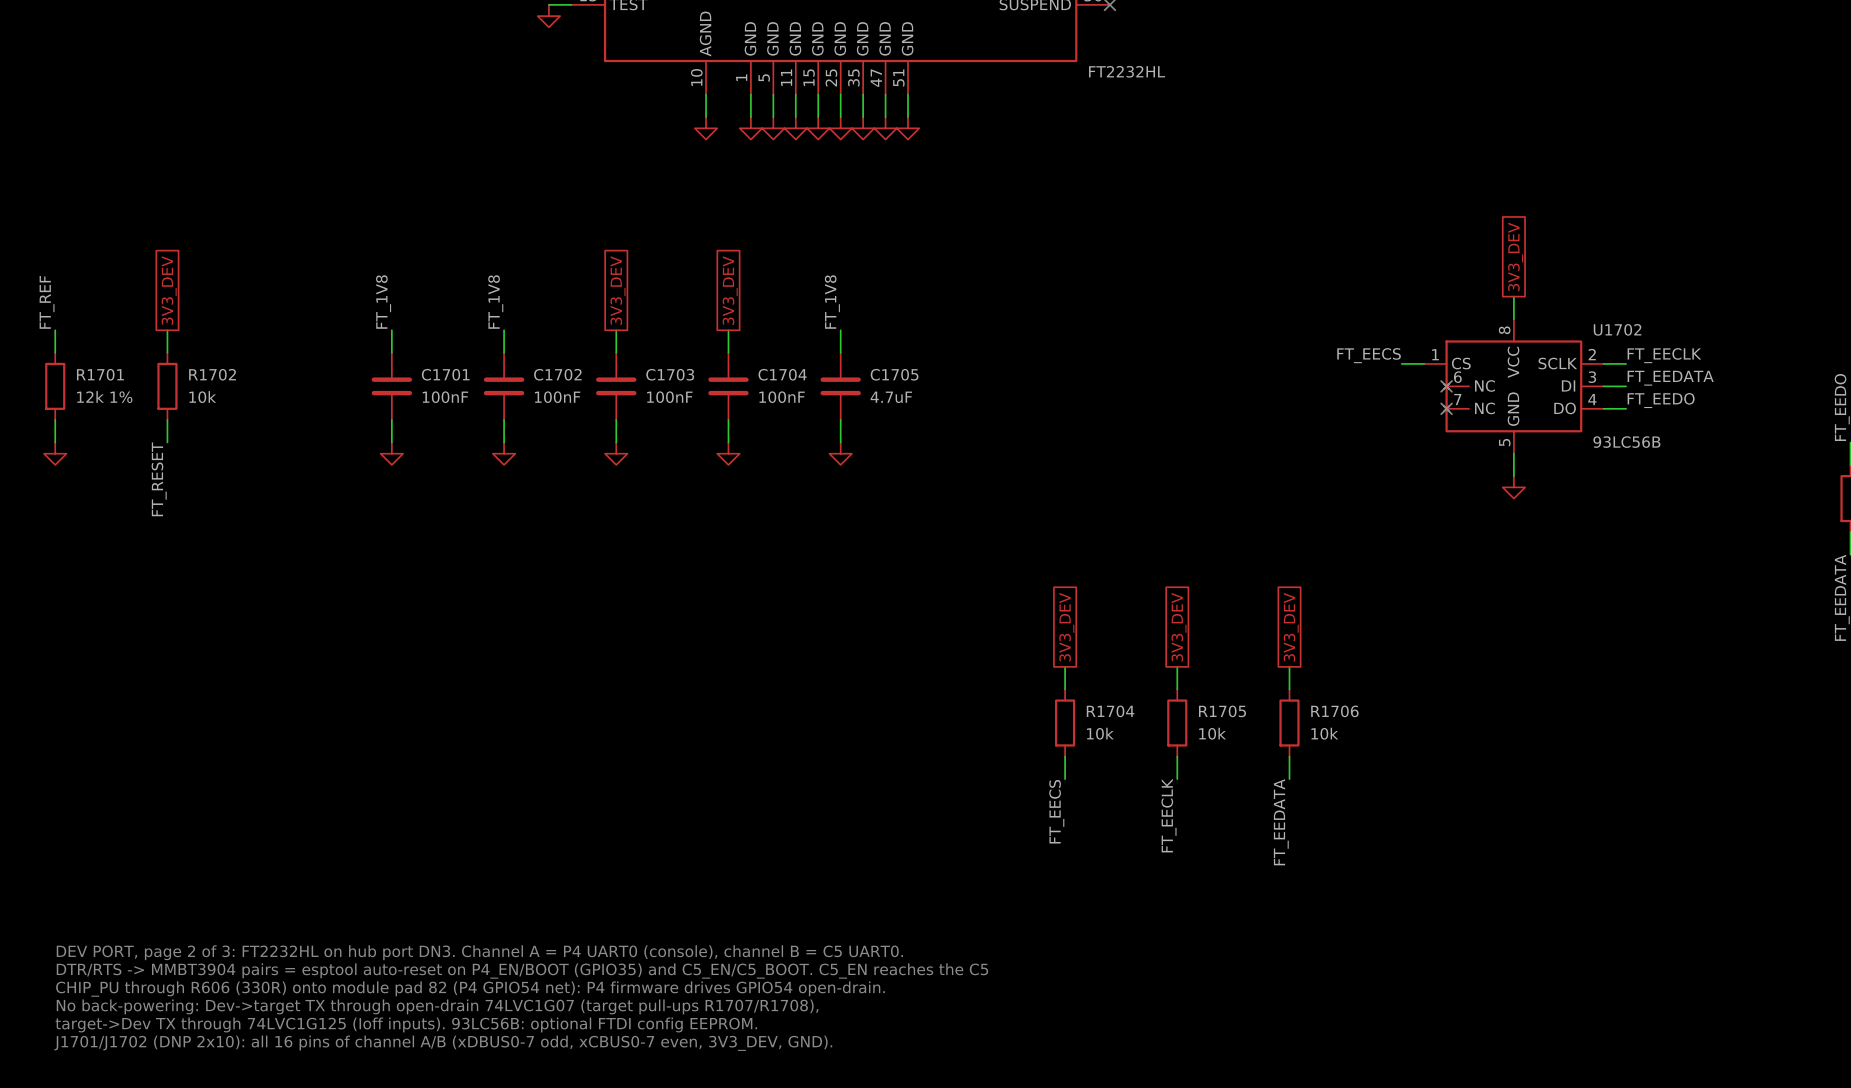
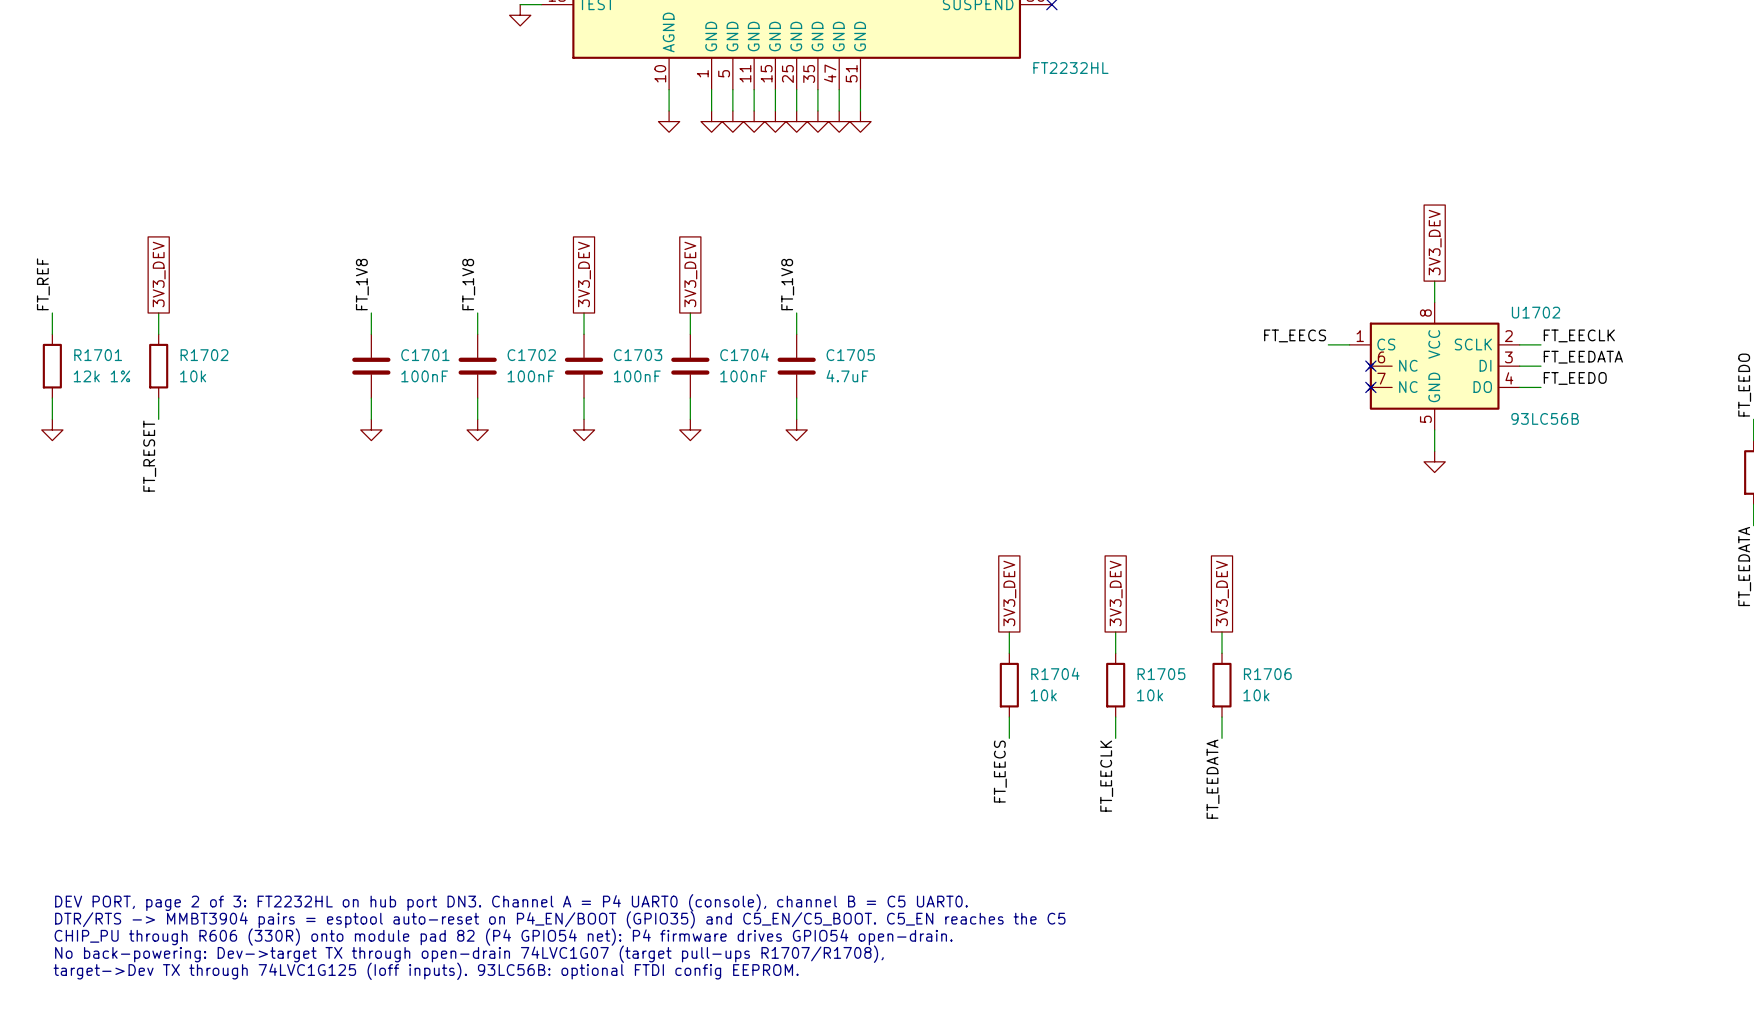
text: J1701/J1702 (DNP 2x10): all 16 pins of channel A/B (xDBUS0-7 odd, xCBUS0-7 even, 3V3_DEV, GND). (443, 1043) -> none

